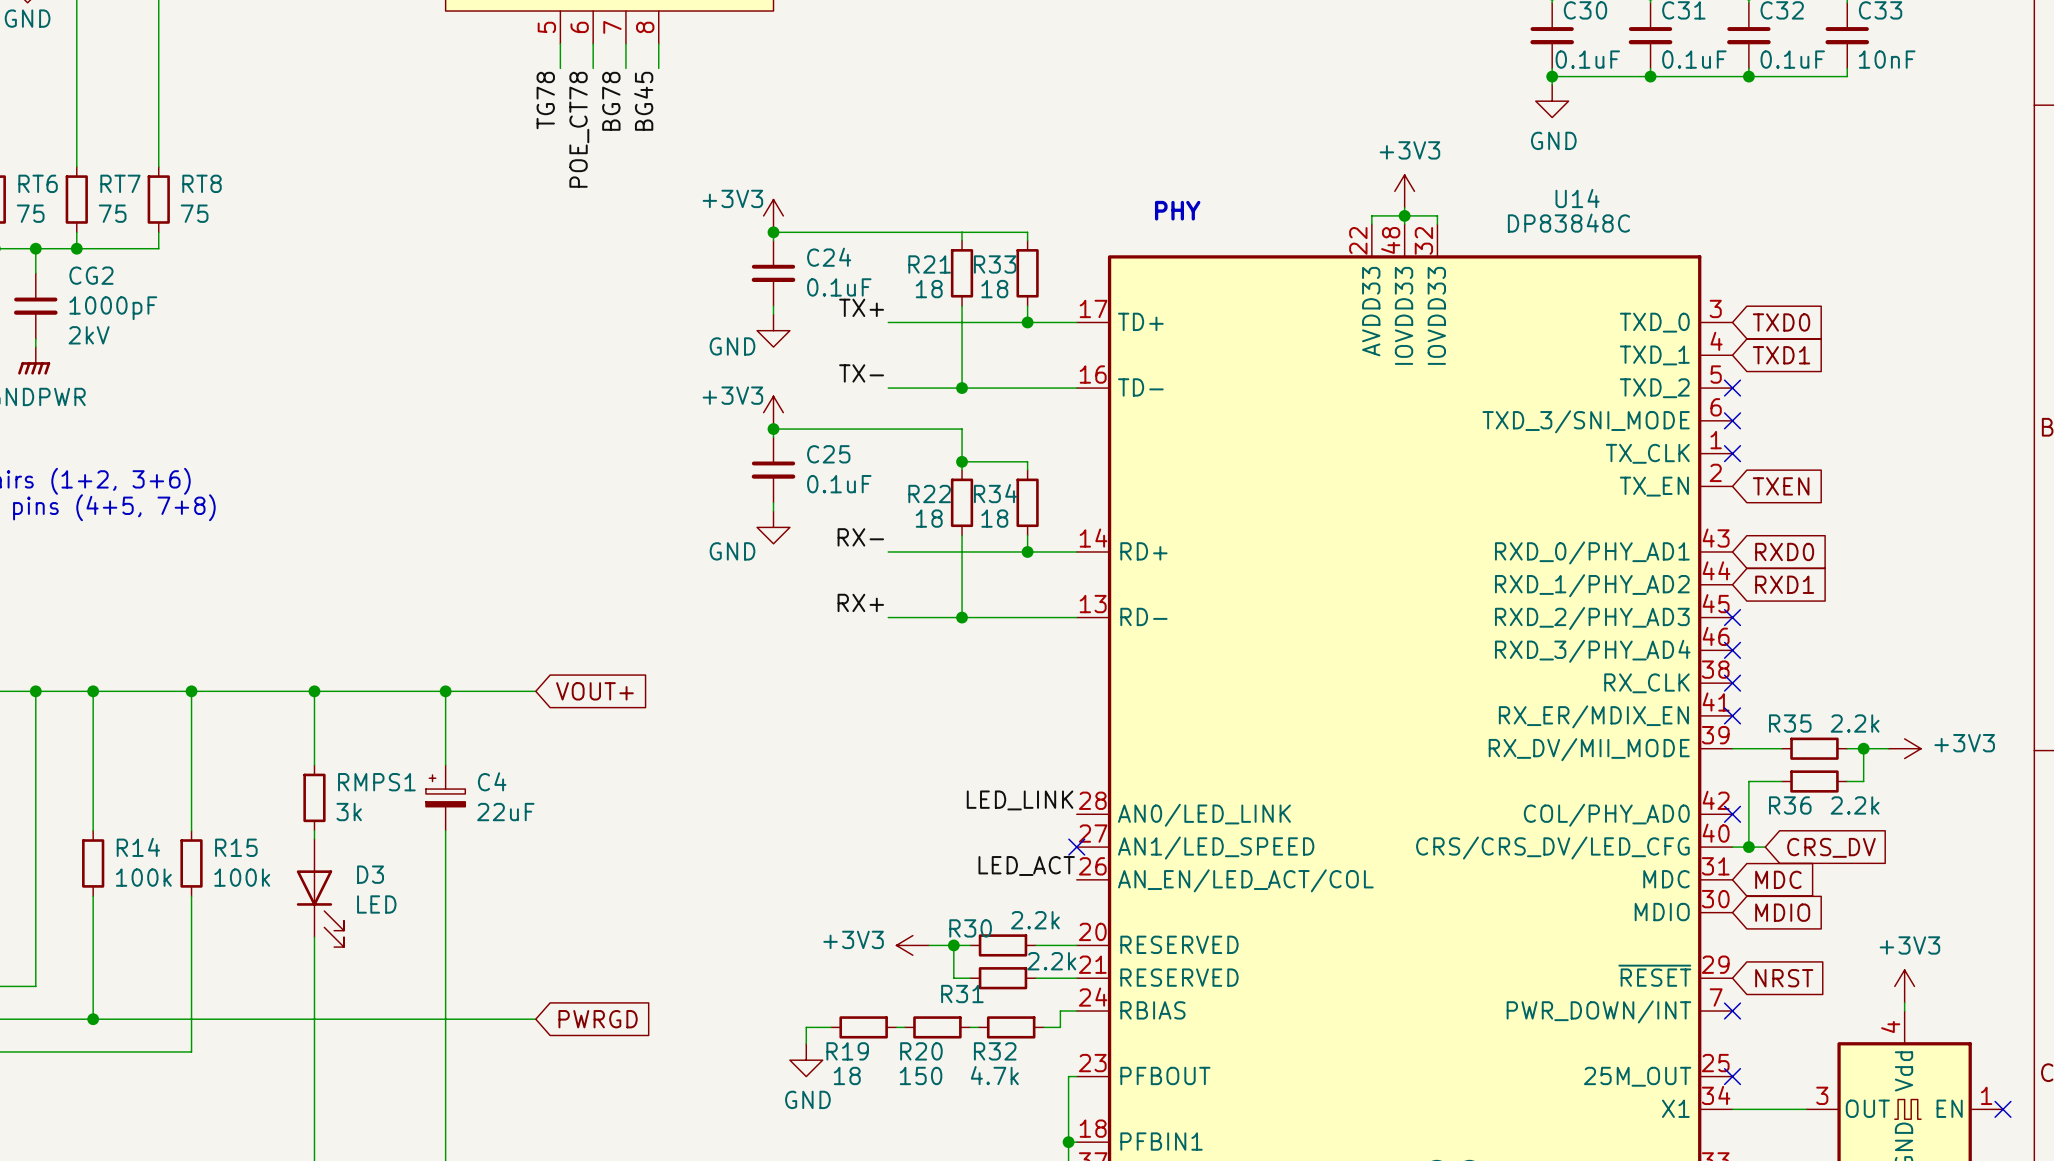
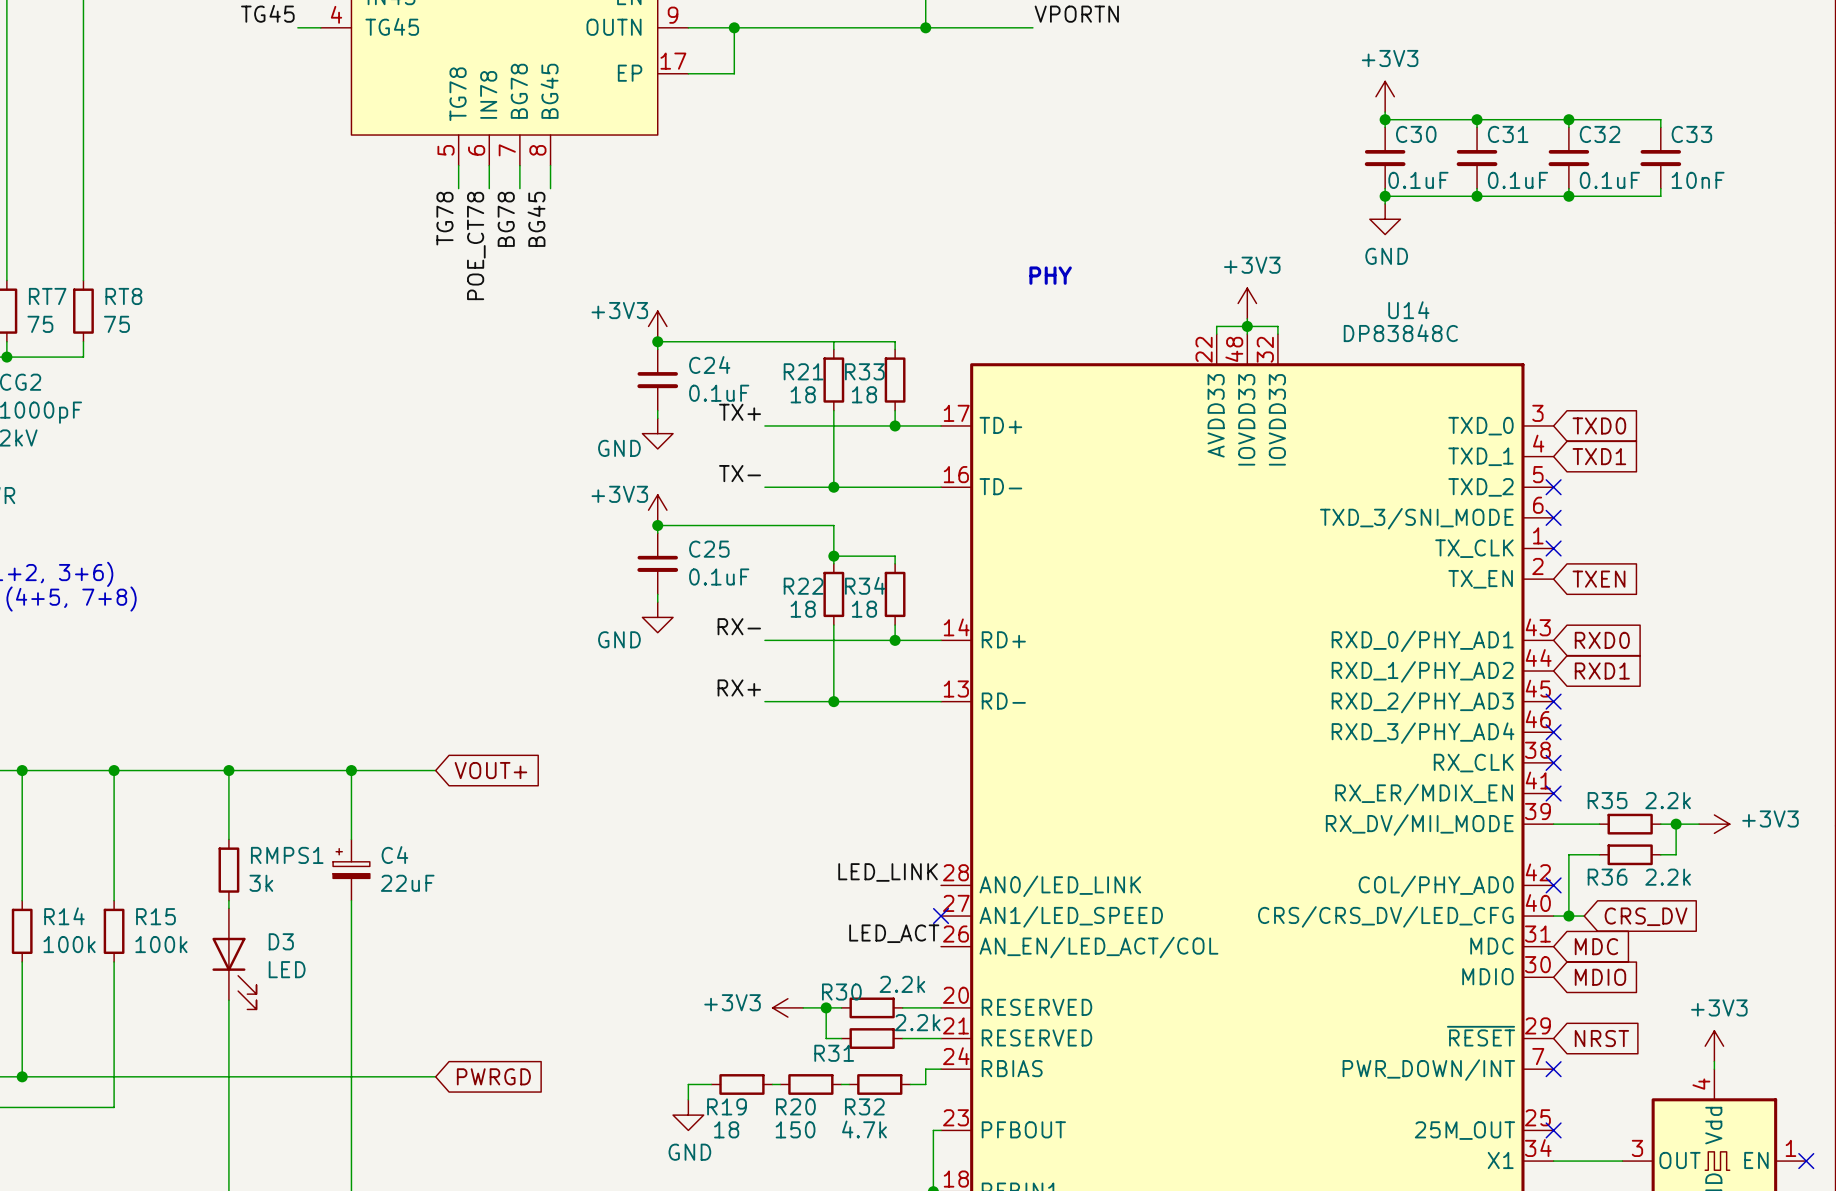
text position: PHY (1177, 210) -> PHY (1050, 275)

